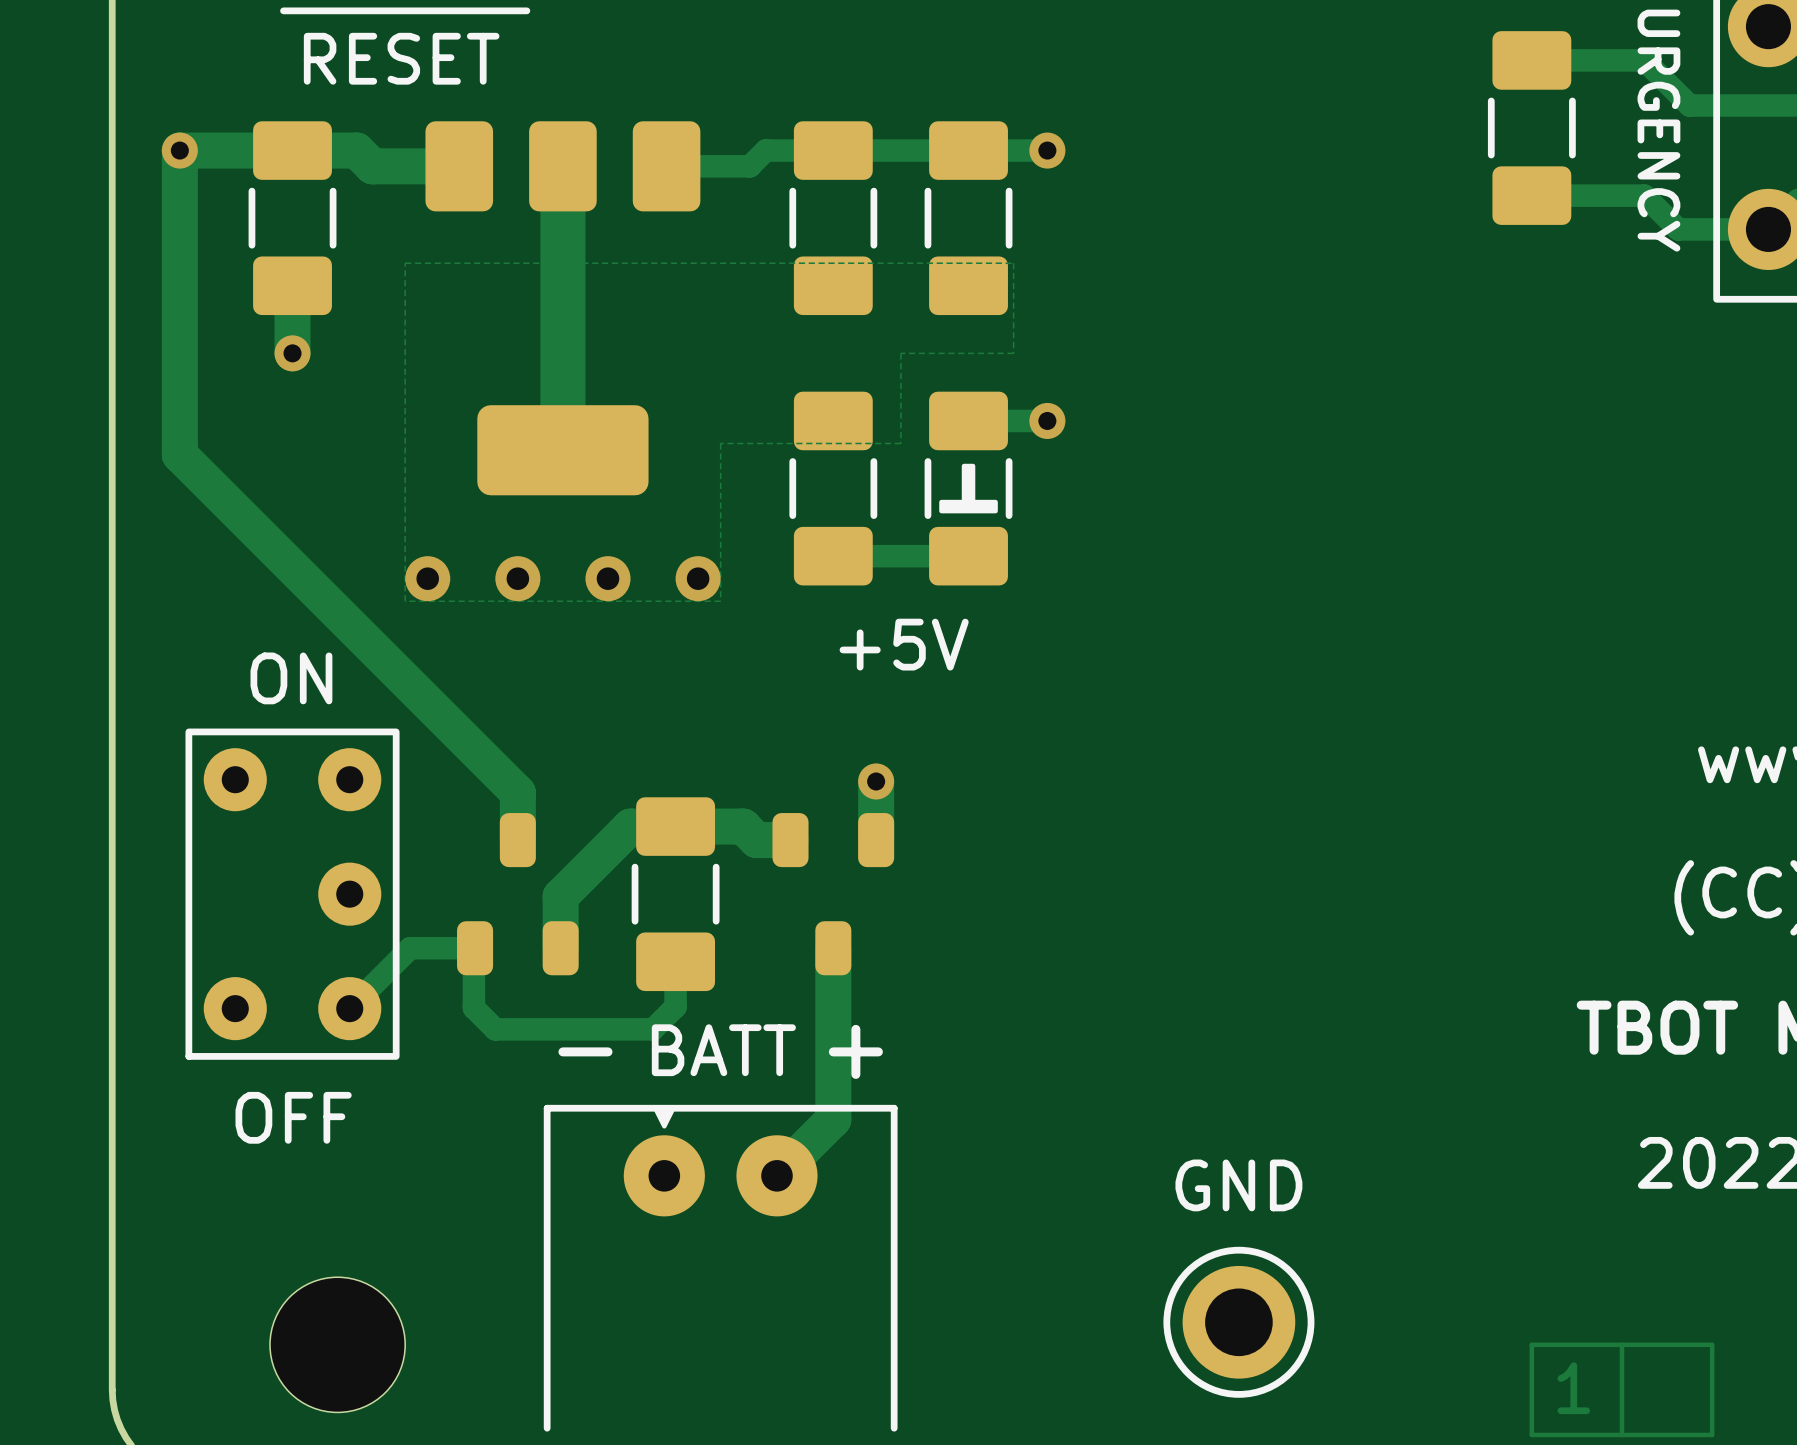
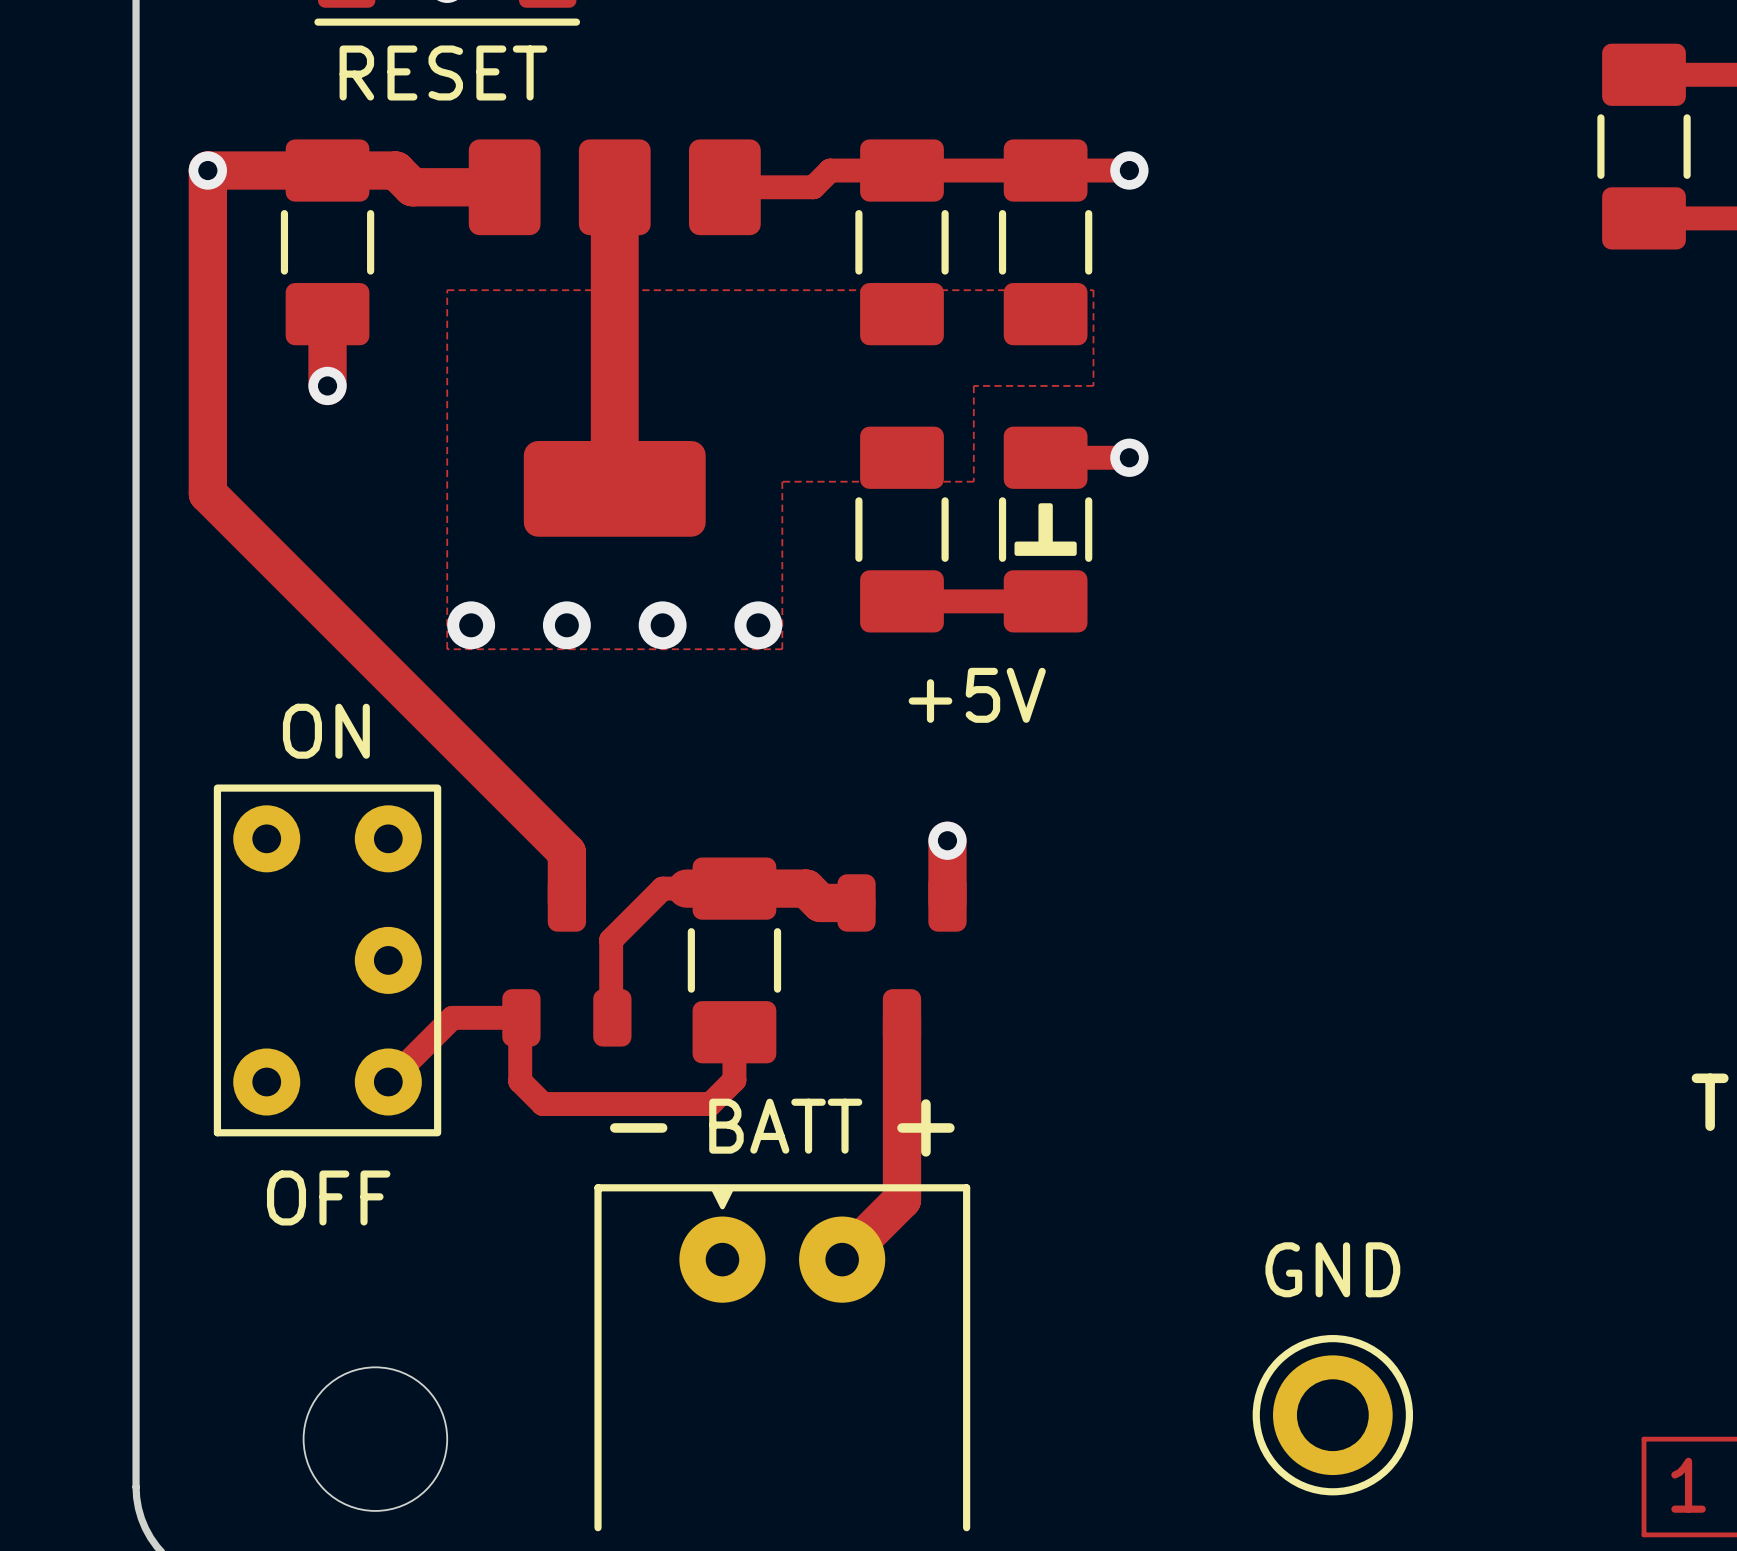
track: (630, 826) (560, 896) (560, 948) -> (686, 888) (662, 888) (611, 940) (611, 1017)

